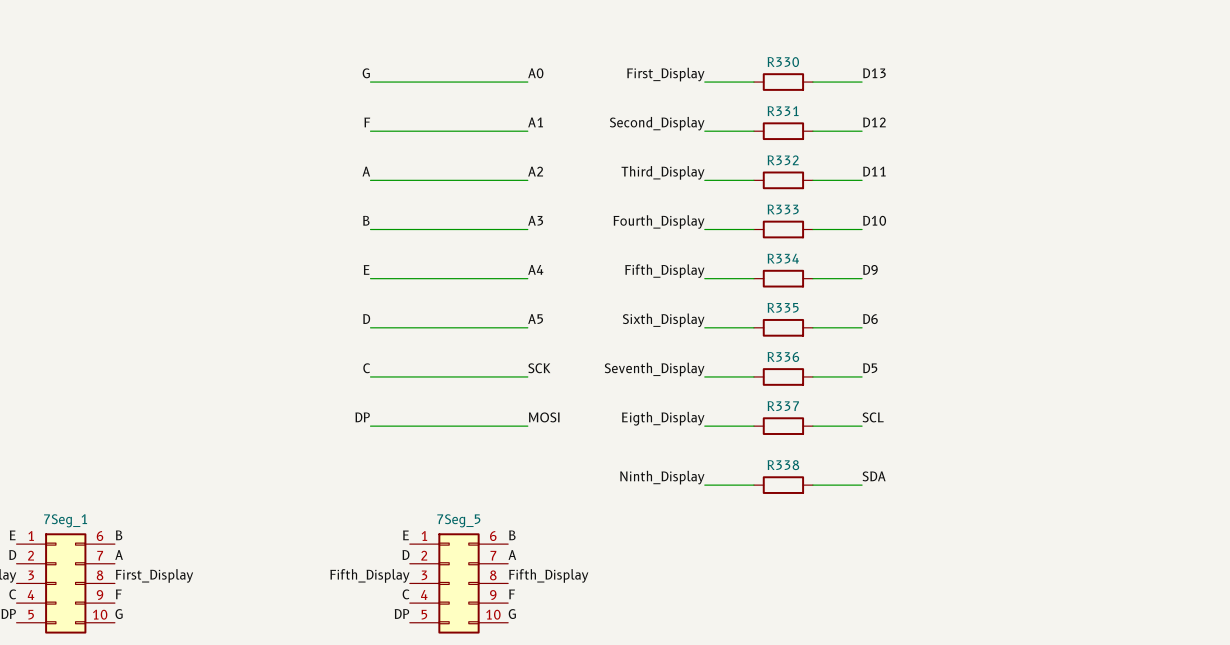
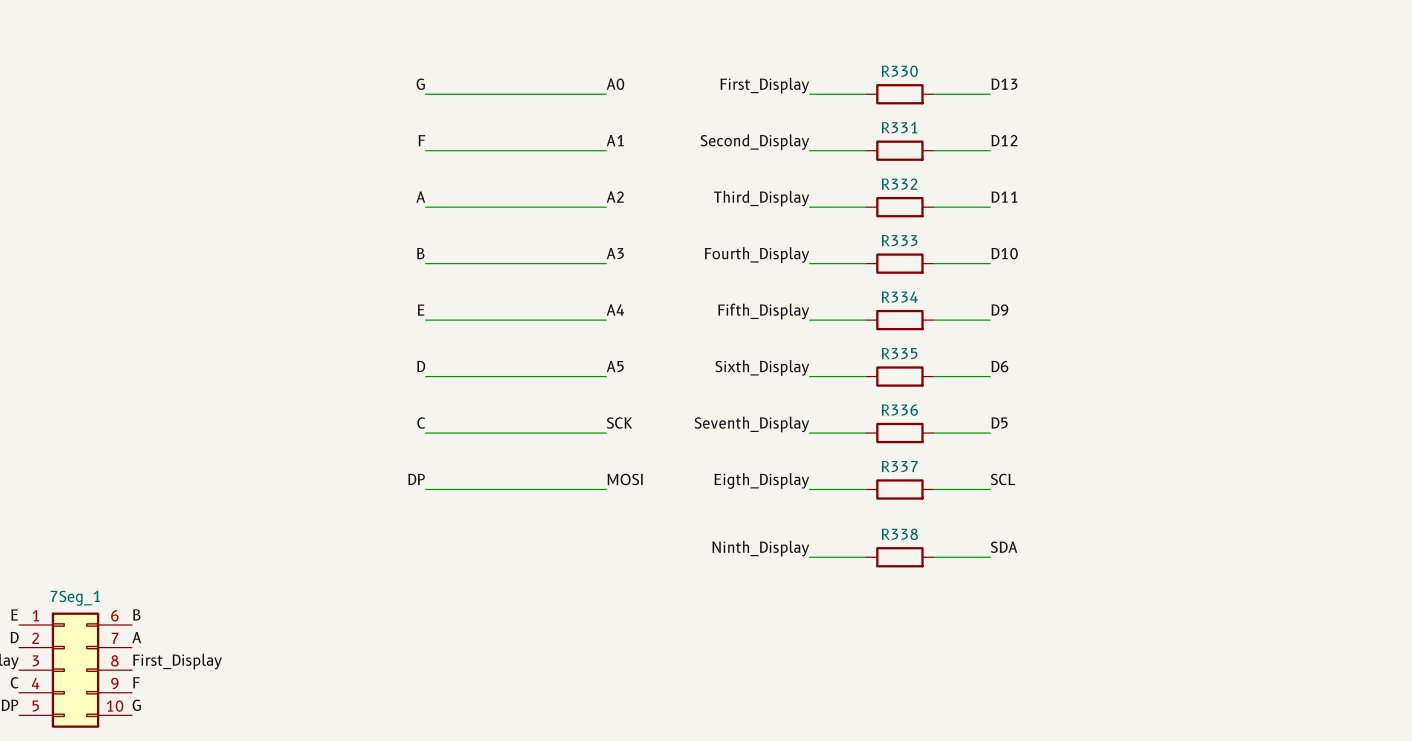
label: E (405, 535) -> none
label: B (512, 535) -> none
label: A (512, 554) -> none
label: D (405, 555) -> none
label: Fifth_Display (369, 575) -> none
label: Fifth_Display (548, 575) -> none
7Seg_5: (458, 583) -> none
label: C (406, 594) -> none
label: F (512, 594) -> none
label: DP (401, 614) -> none
label: G (512, 614) -> none

